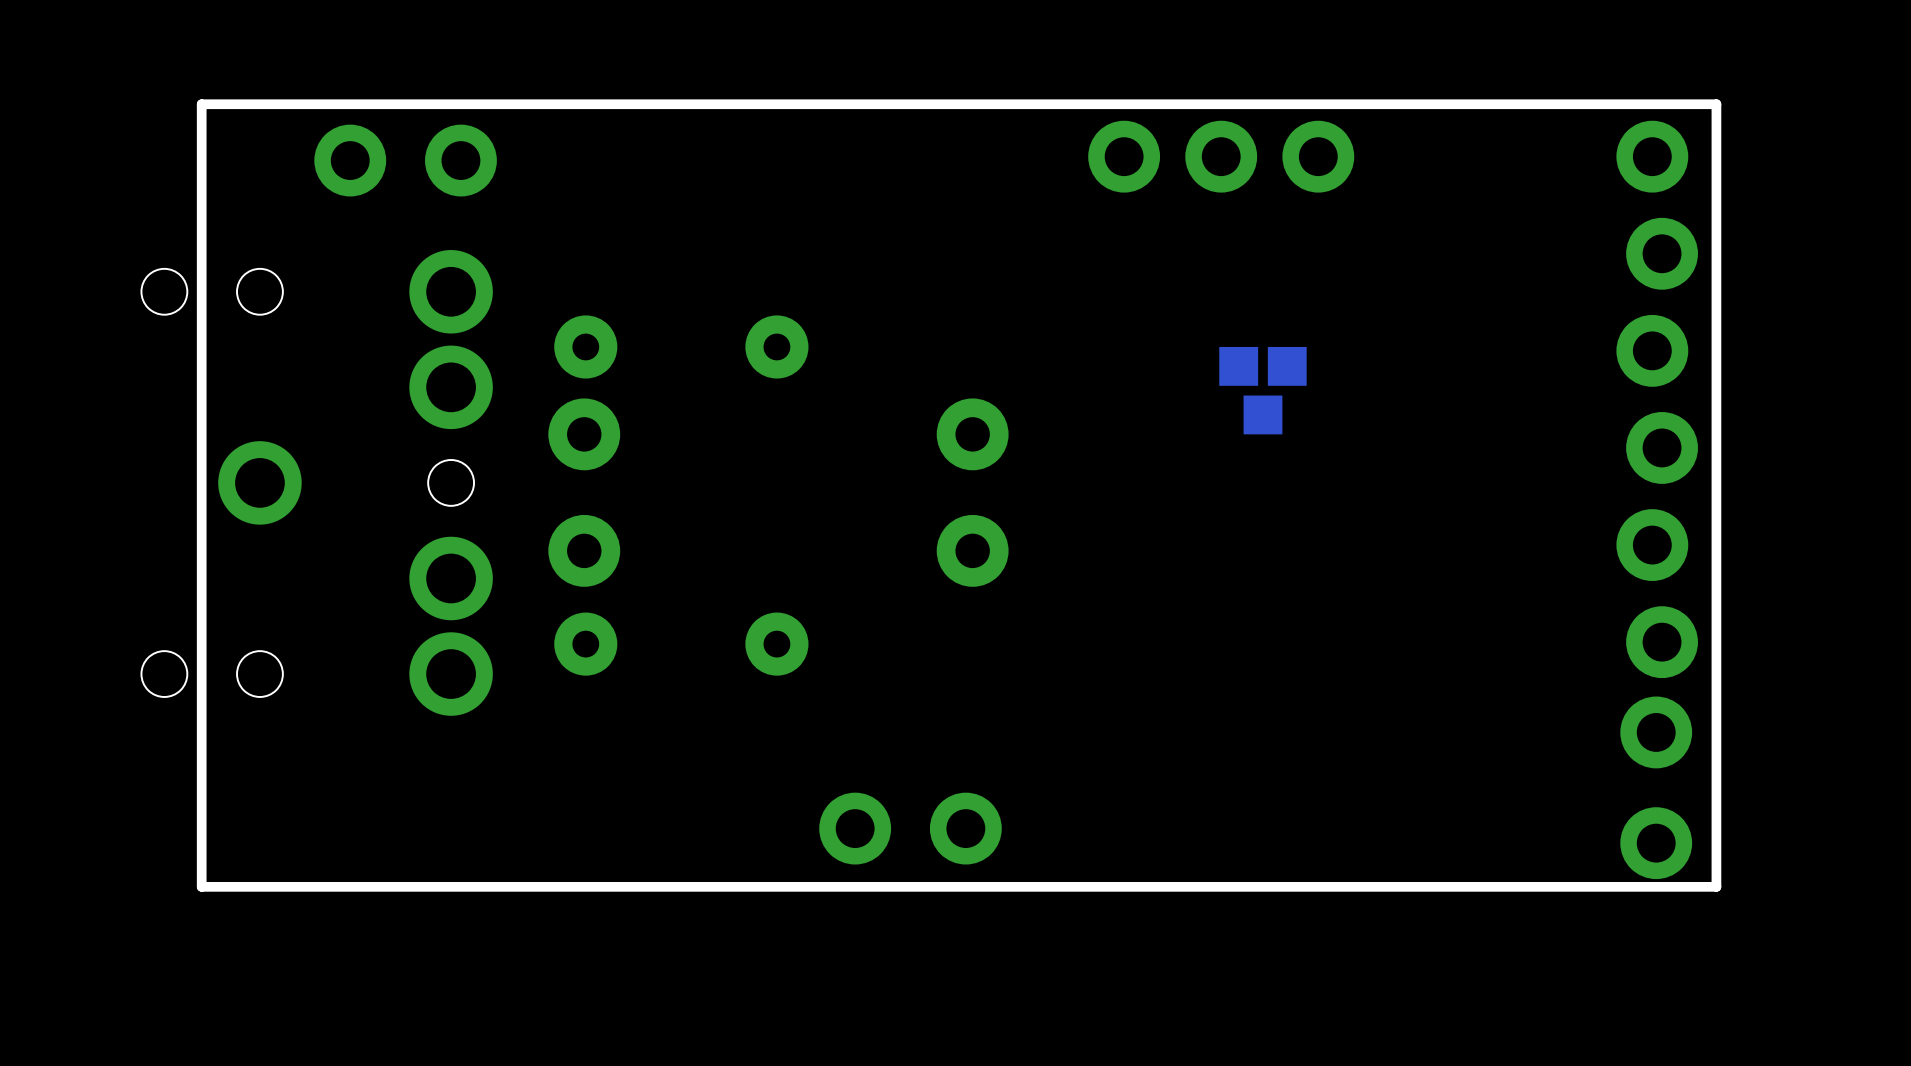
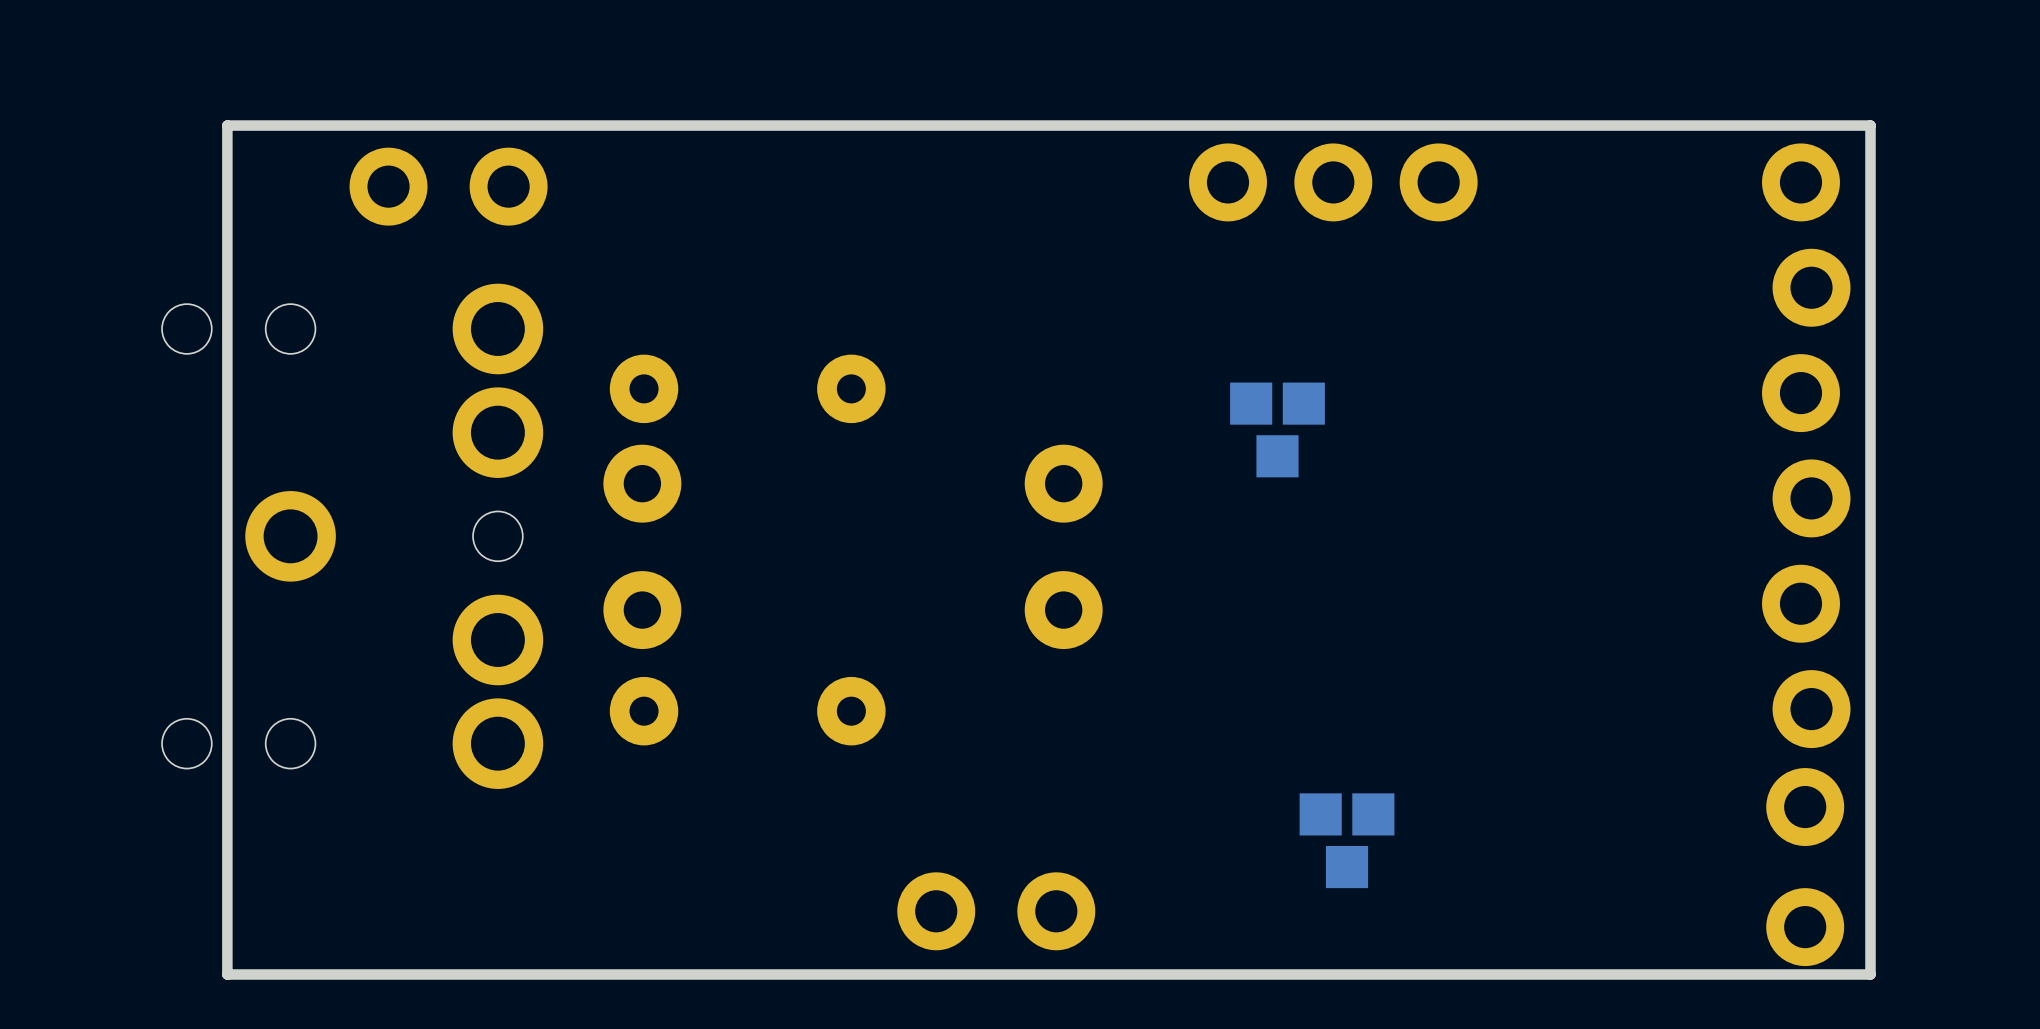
part position: (1262, 390) -> (1277, 429)
part: none -> (1347, 840)

